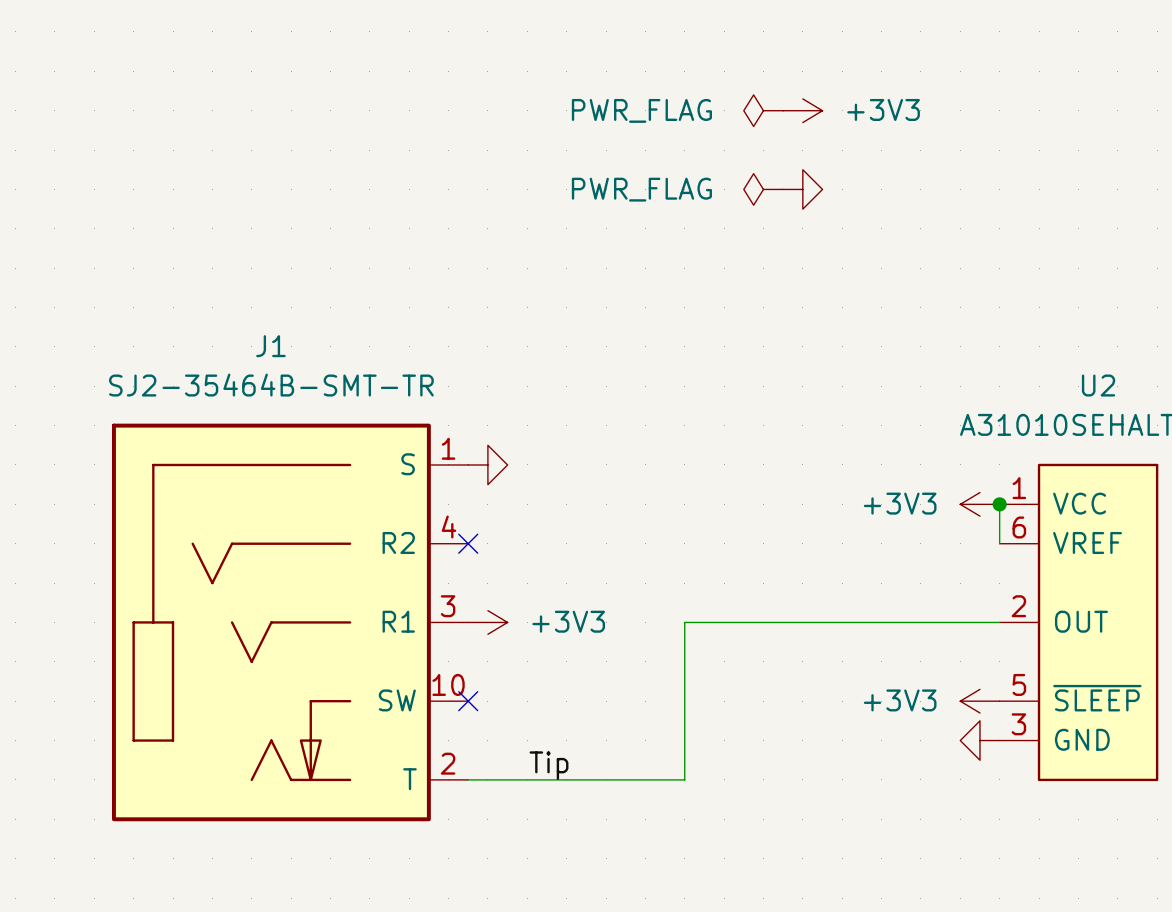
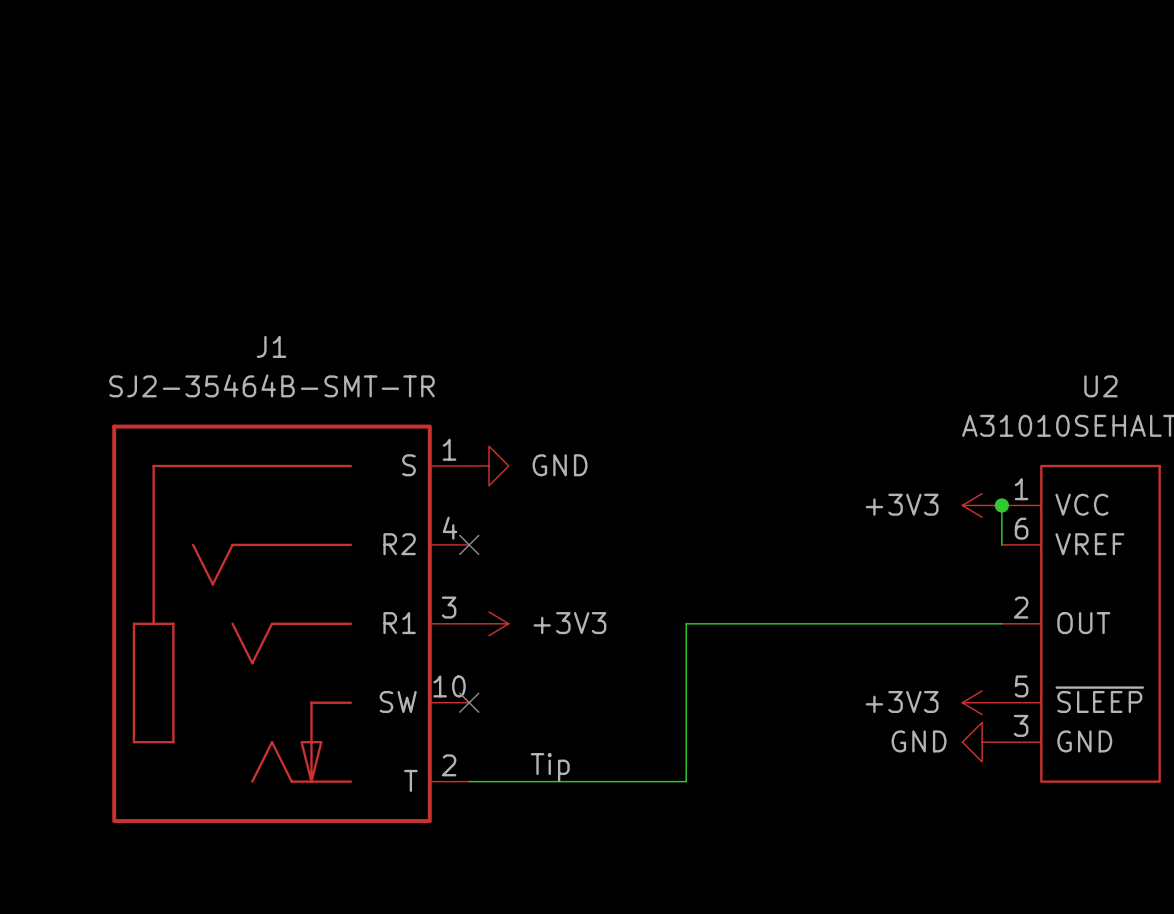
power symbol: PWR_FLAG (763, 110) -> none
power symbol: +3V3 (802, 110) -> none
power symbol: PWR_FLAG (763, 189) -> none
power symbol: (802, 189) -> none
power symbol text: none -> GND (560, 465)
power symbol text: none -> GND (919, 741)

